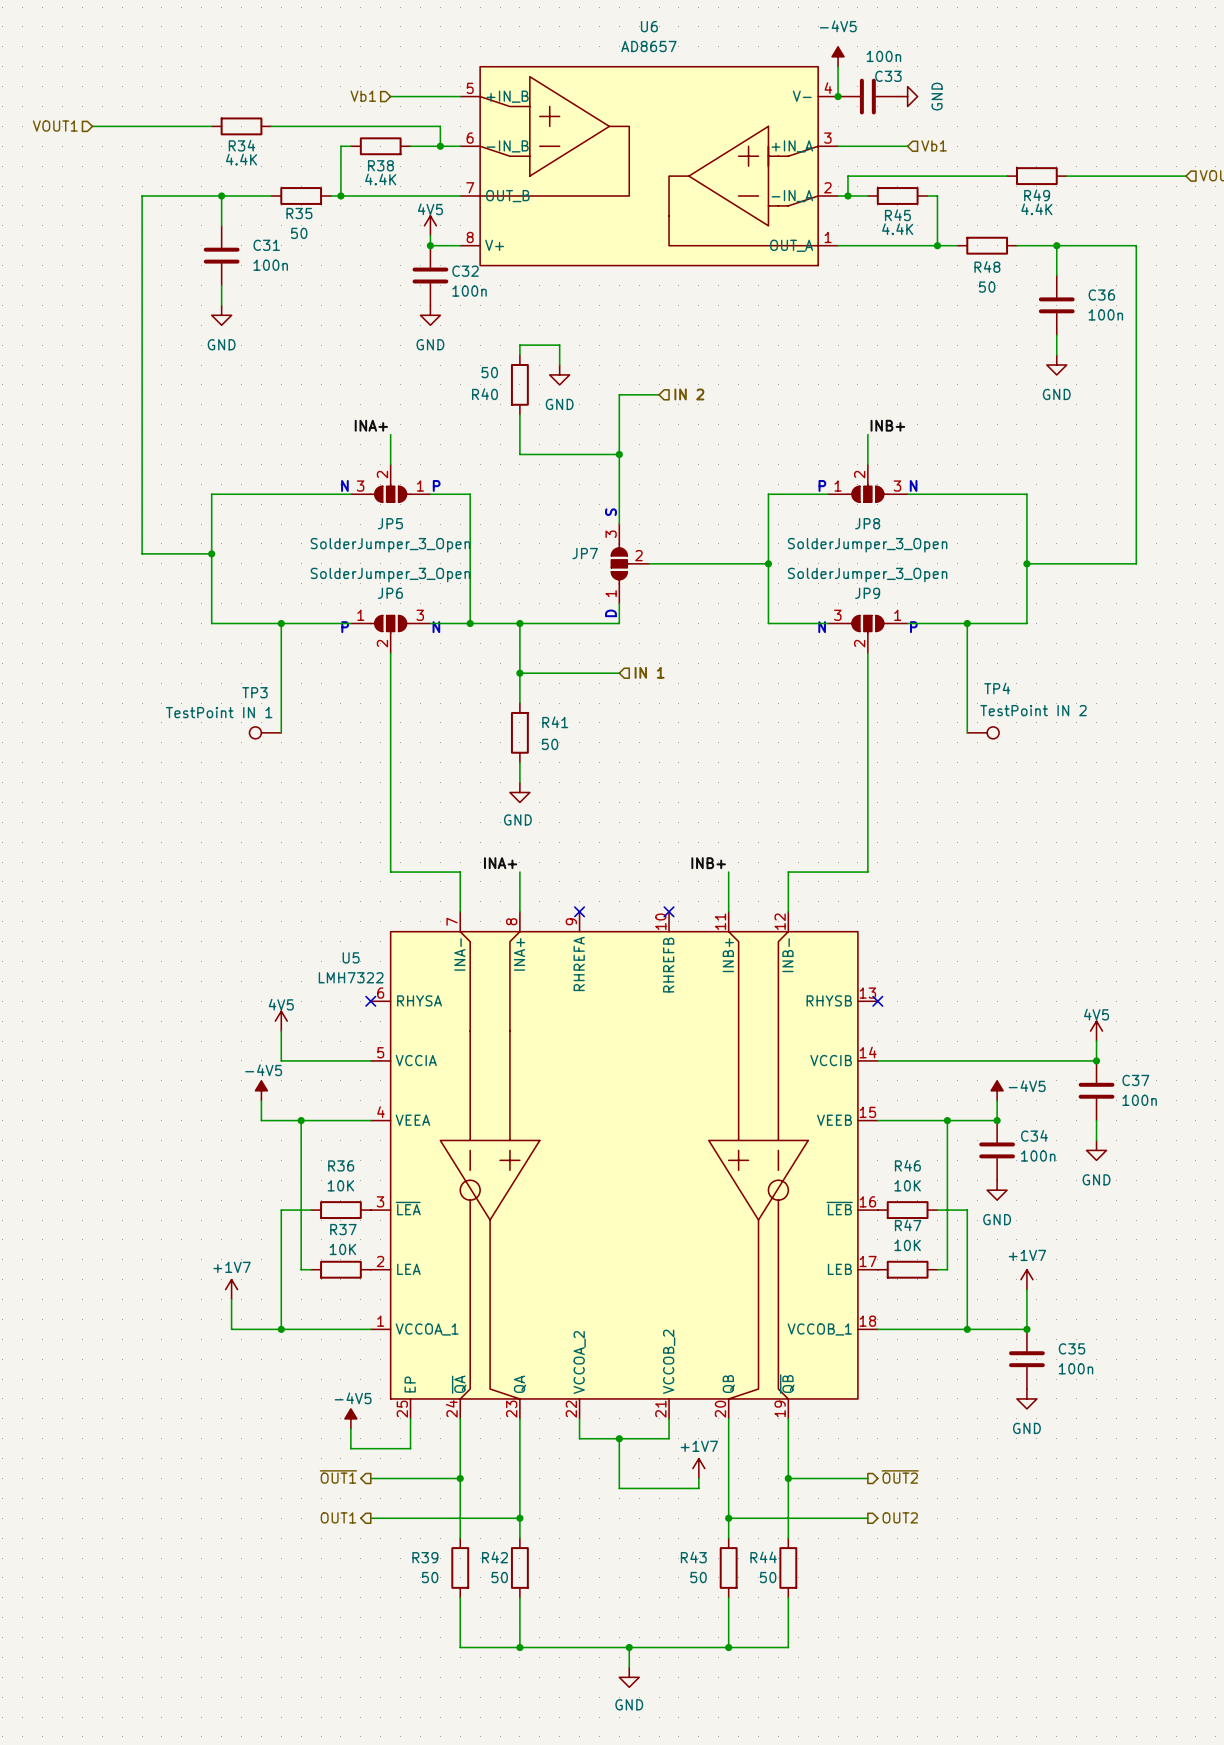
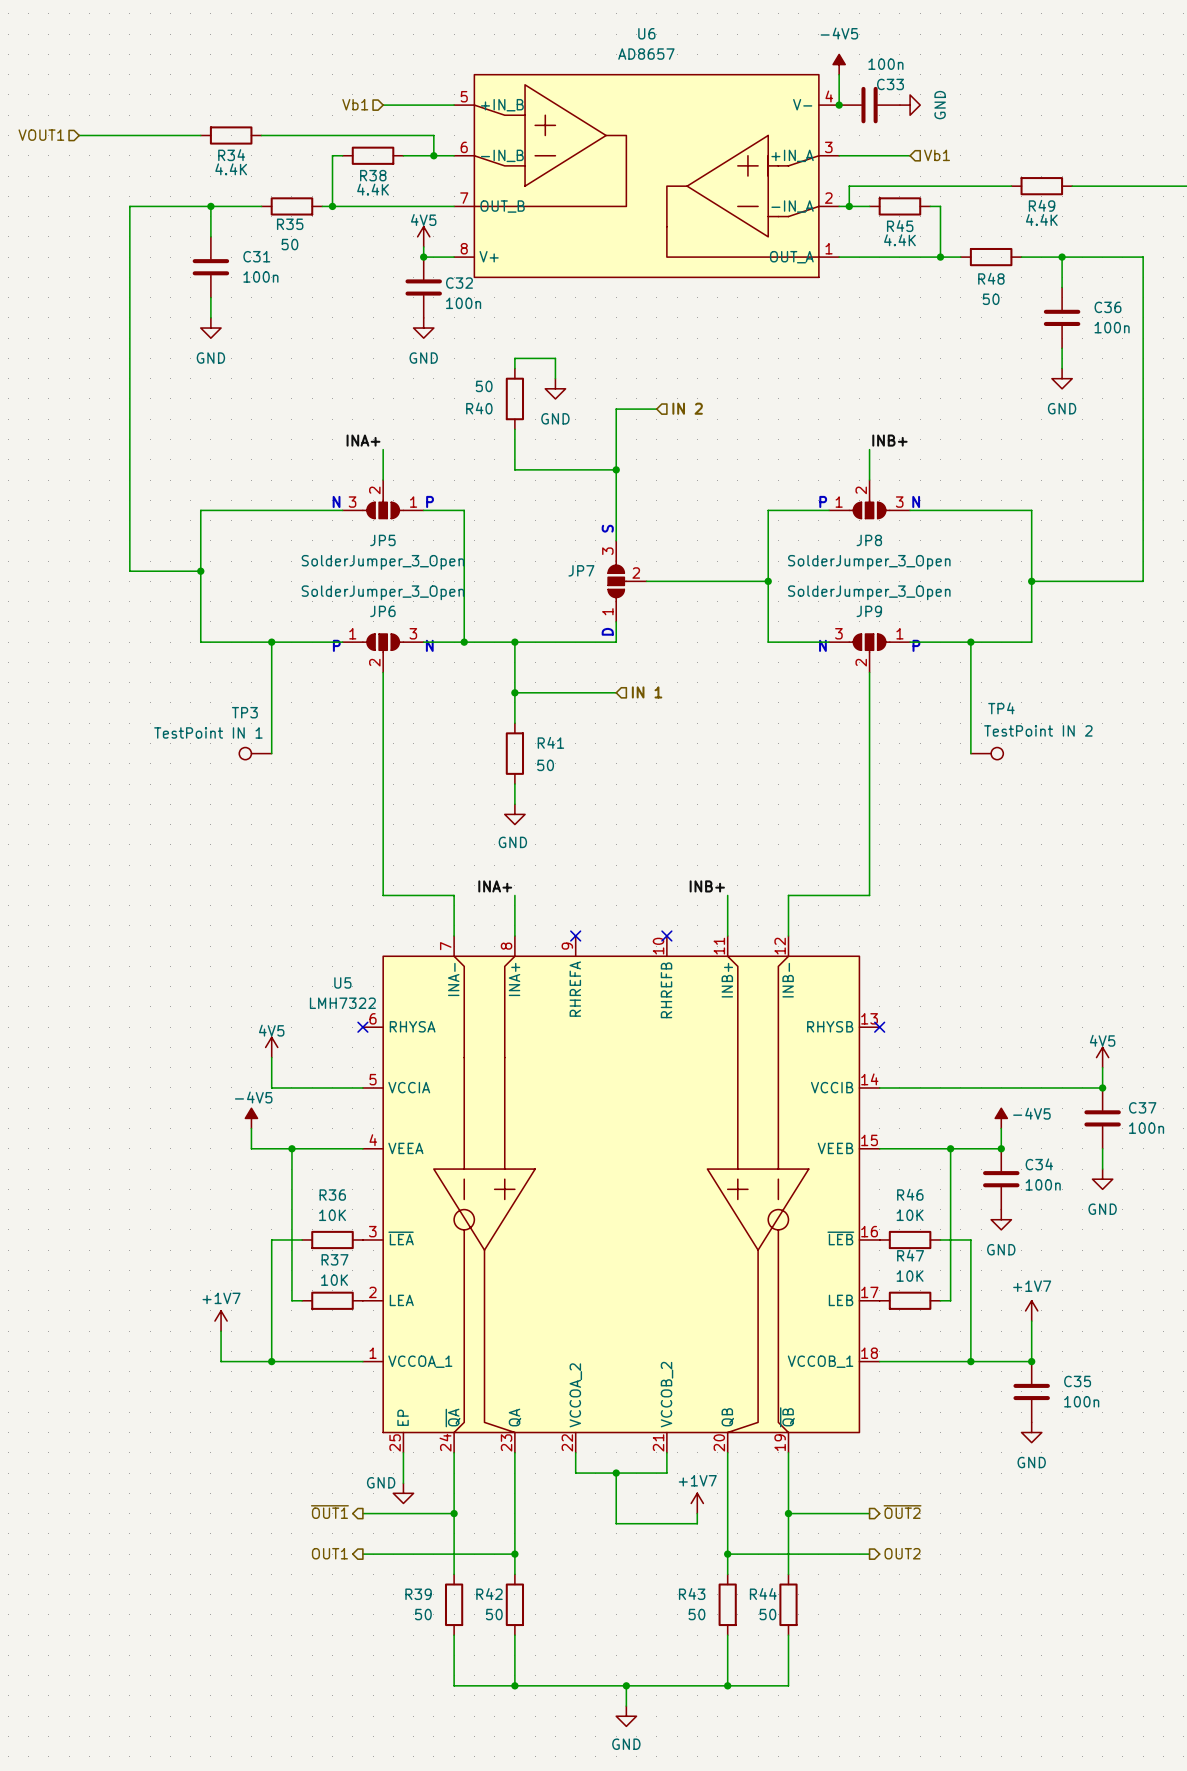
power symbol: -4V5 (350, 1418) -> none
wire: (350, 1428) (350, 1448) (410, 1448) -> none
power symbol: none -> GND (403, 1493)

